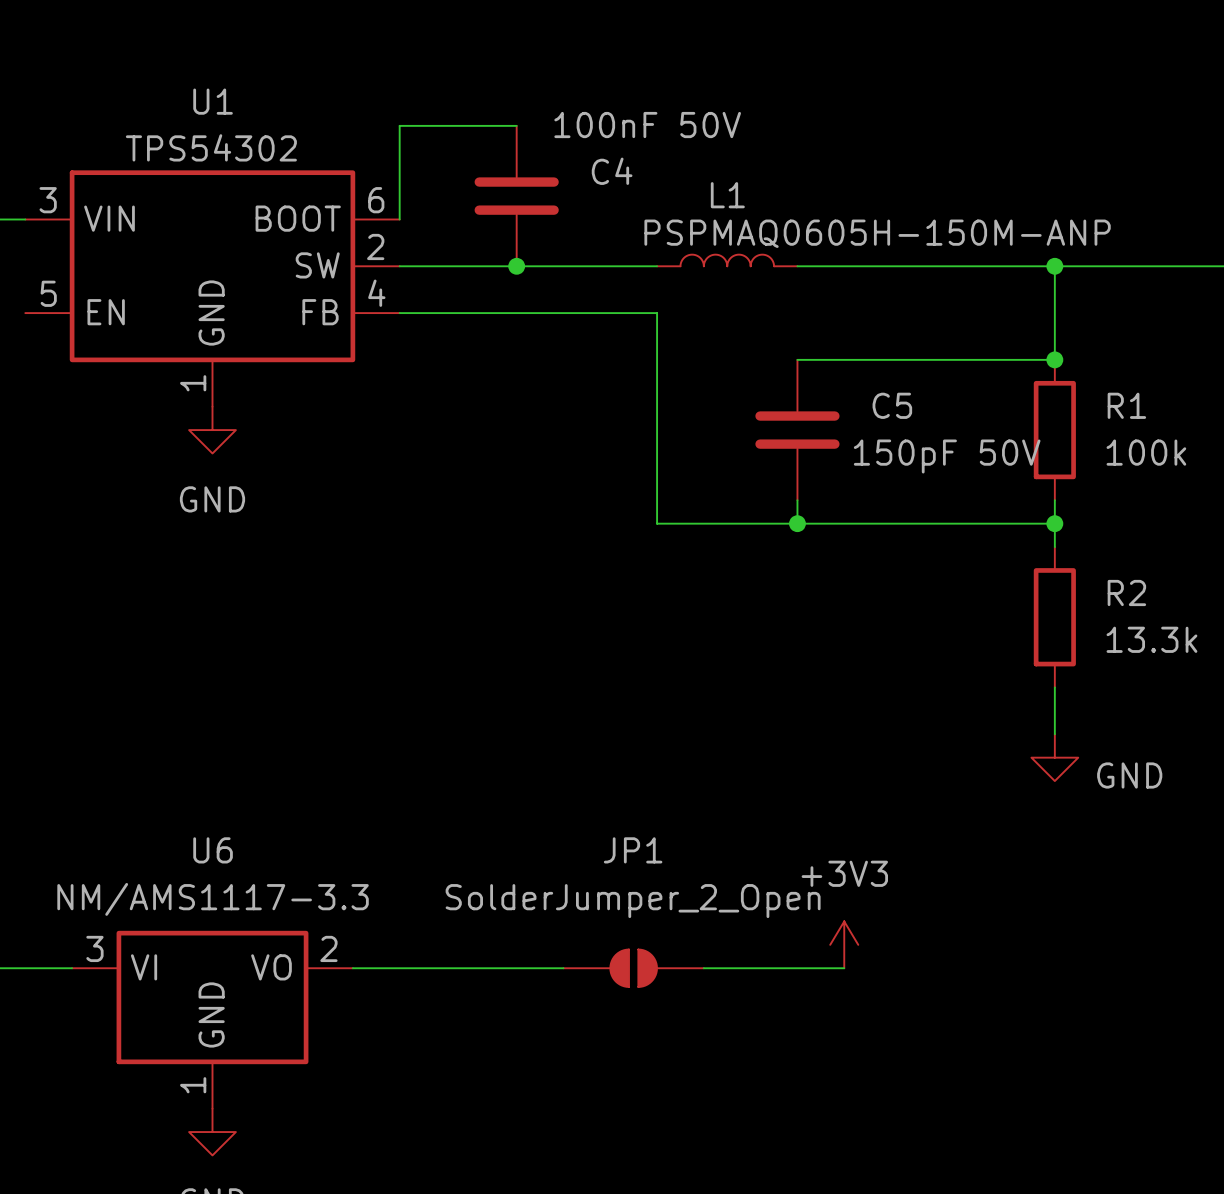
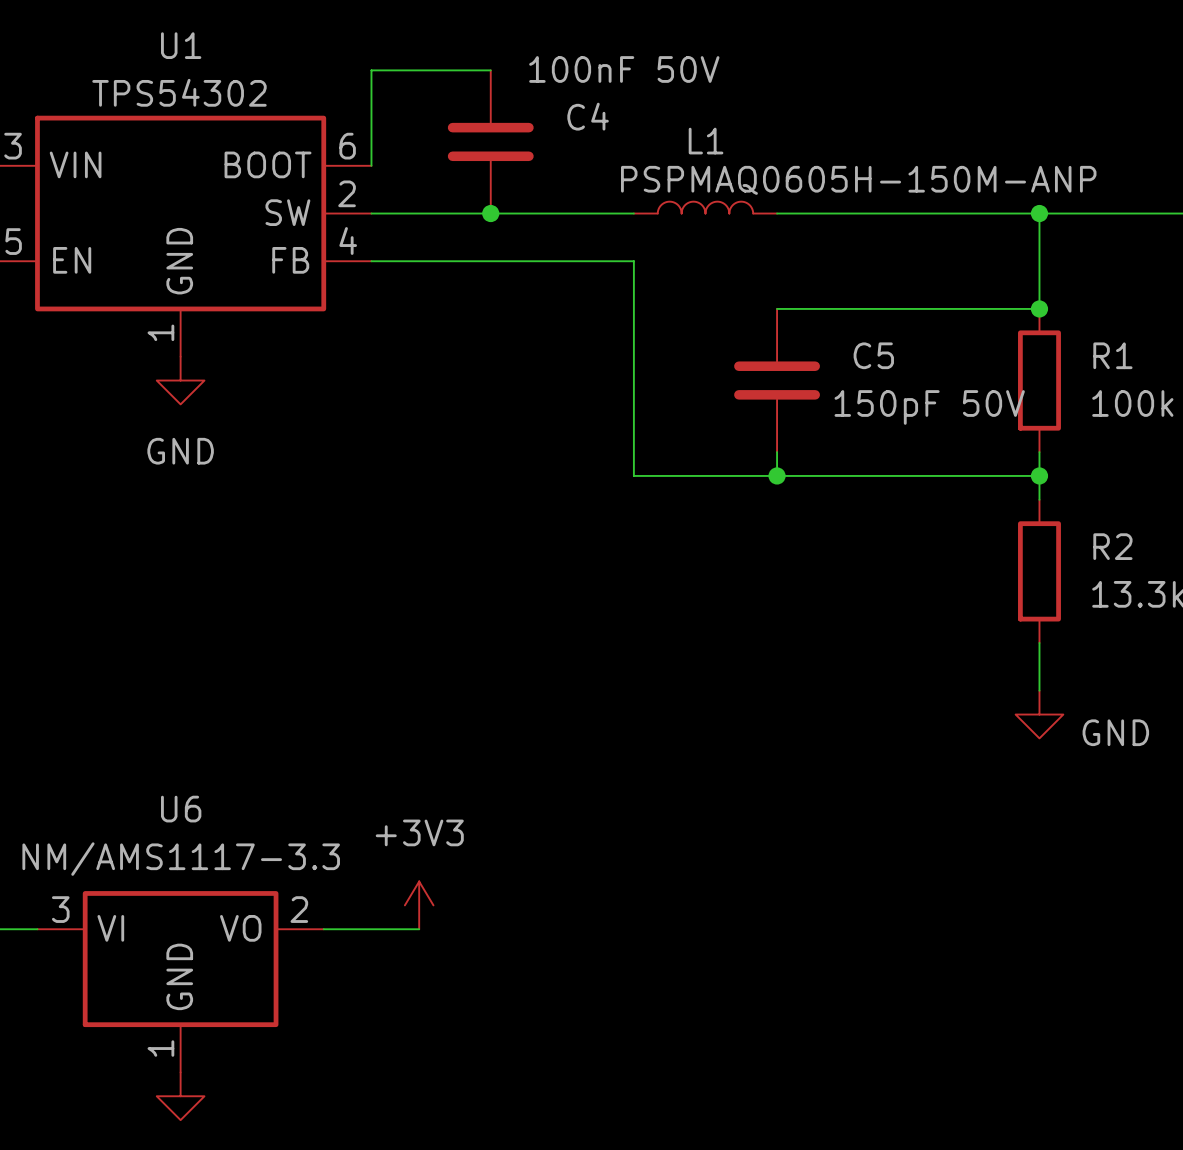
power symbol position: +3V3 (844, 944) -> +3V3 (419, 905)
wire: (446, 968) (563, 968) -> none
JP1: SolderJumper_2_Open (633, 968) -> none
wire: (703, 968) (844, 968) -> none

